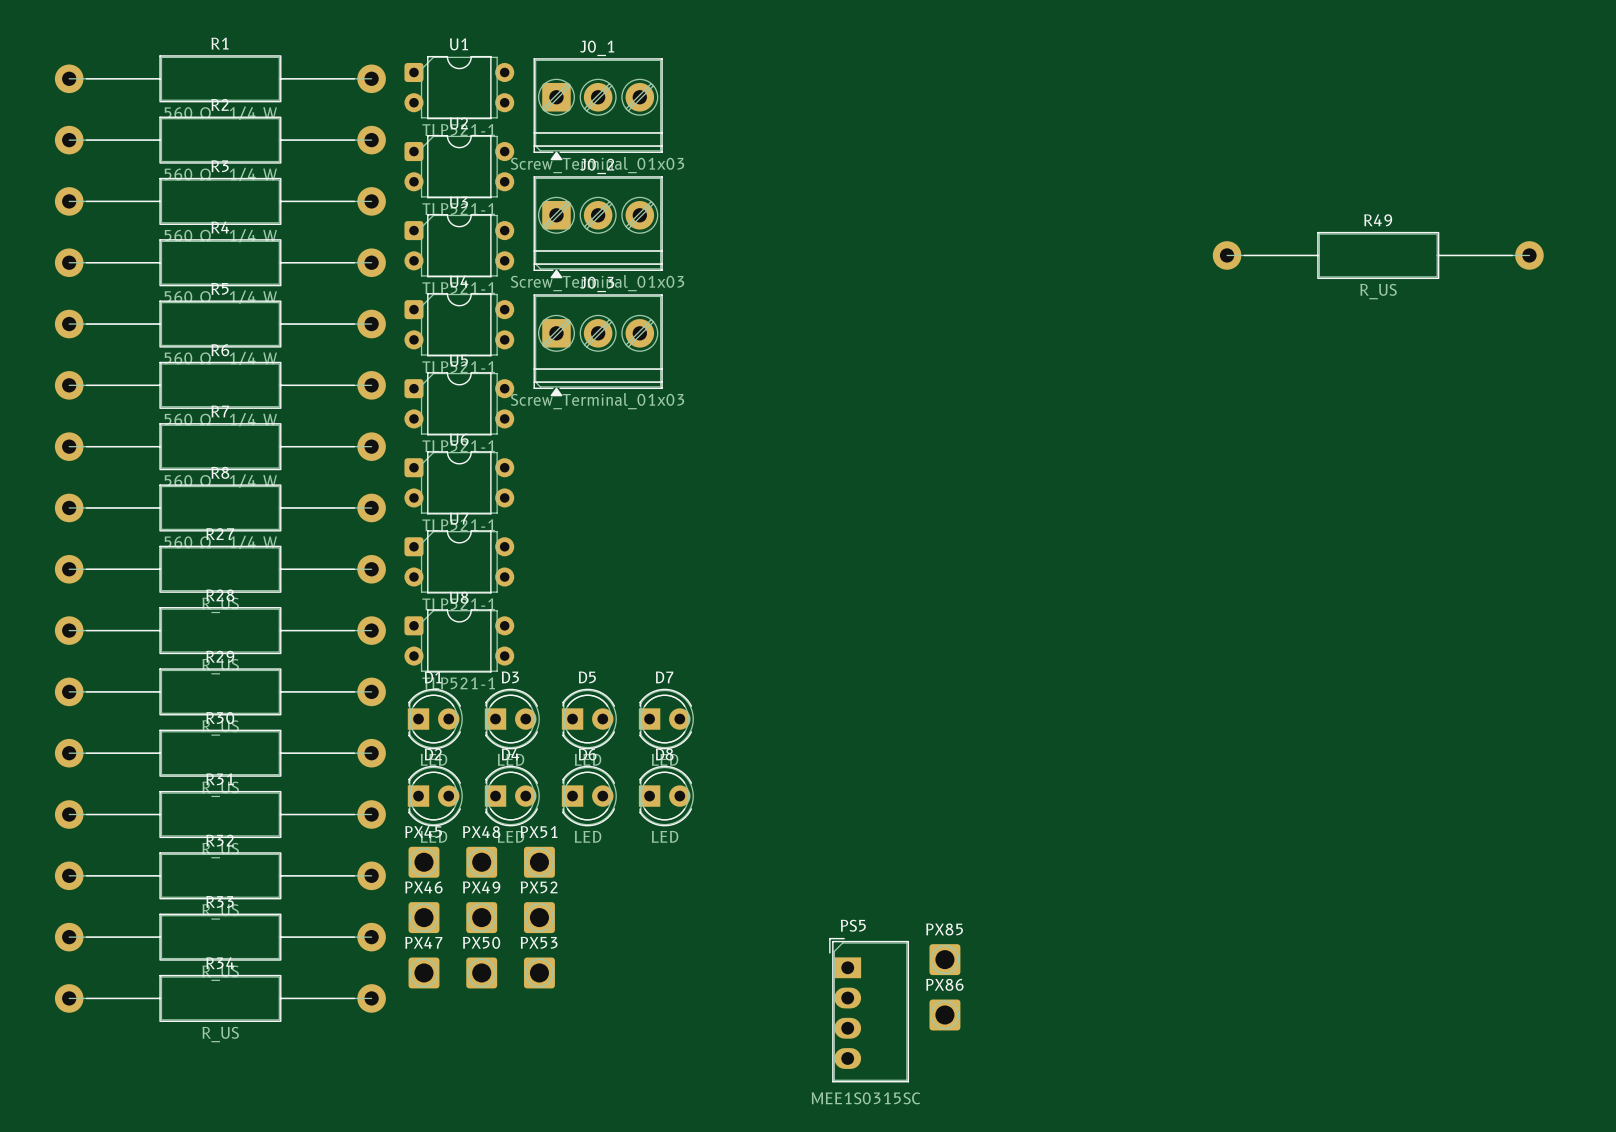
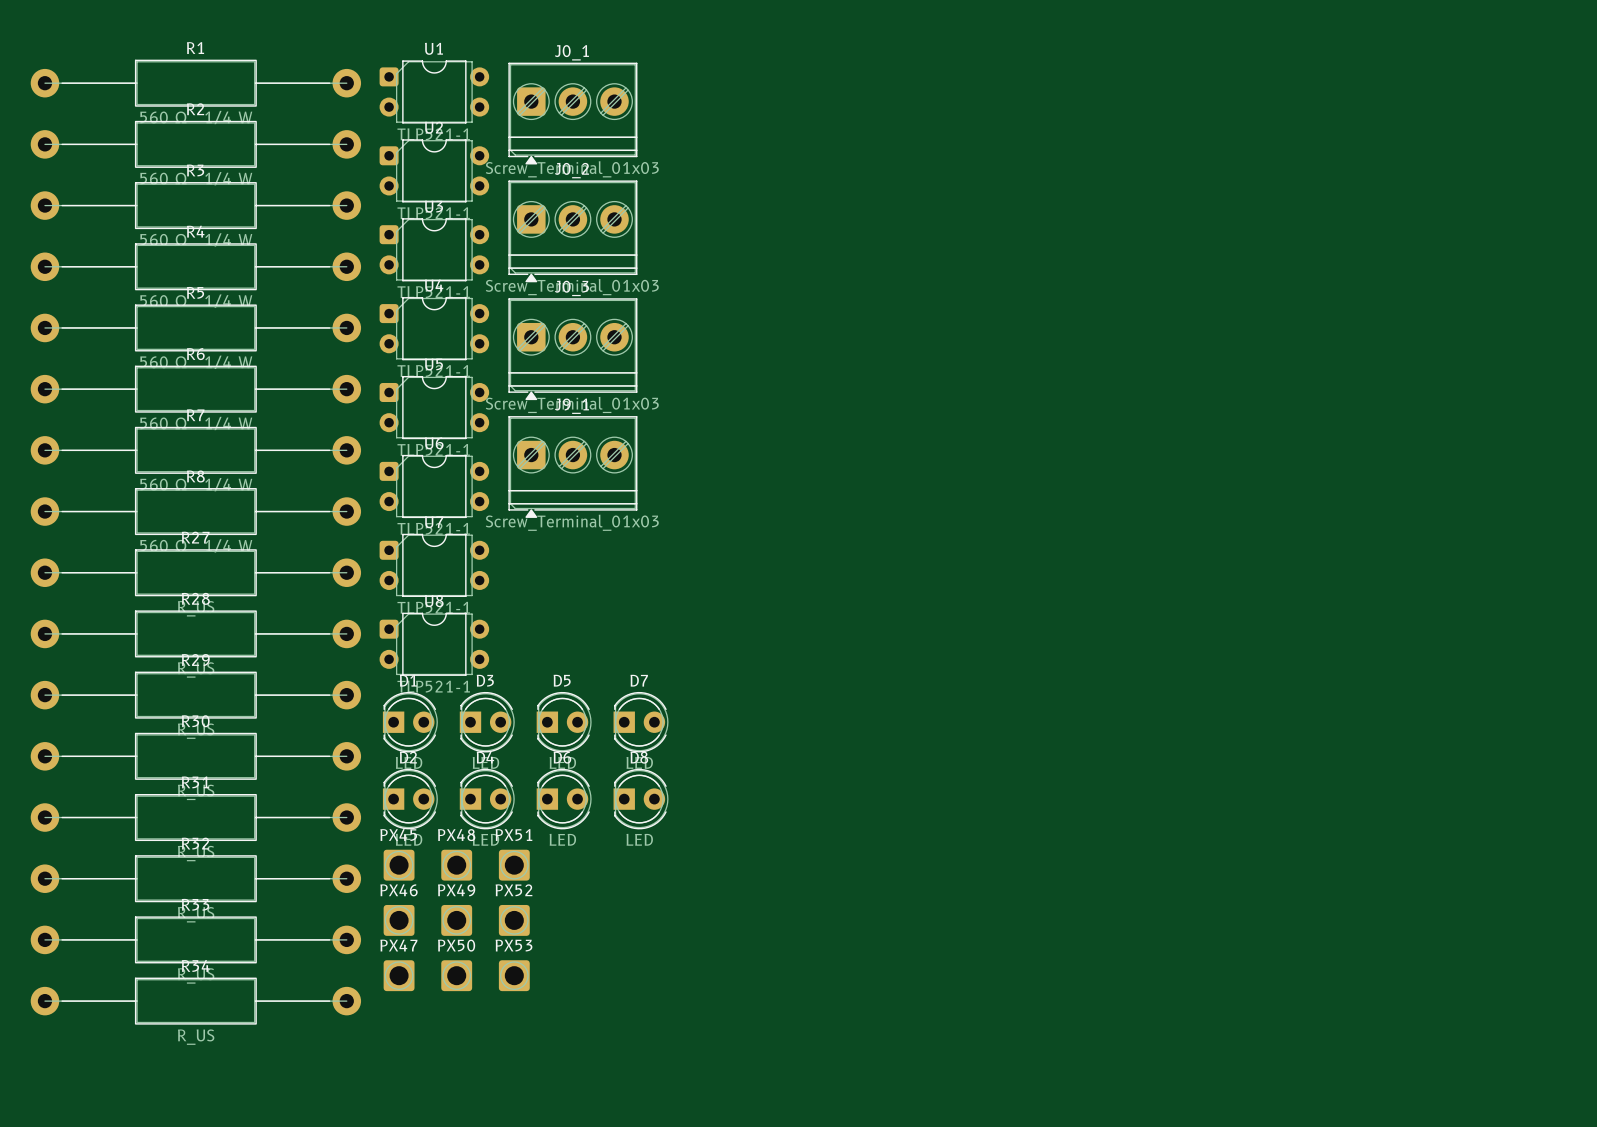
R49: R_US (1378, 255) -> none
J9_1: none -> Screw_Terminal_01x03 (572, 466)
PX85: (944, 959) -> none
PS5: MEE1S0315SC (869, 1010) -> none
PX86: (944, 1014) -> none

